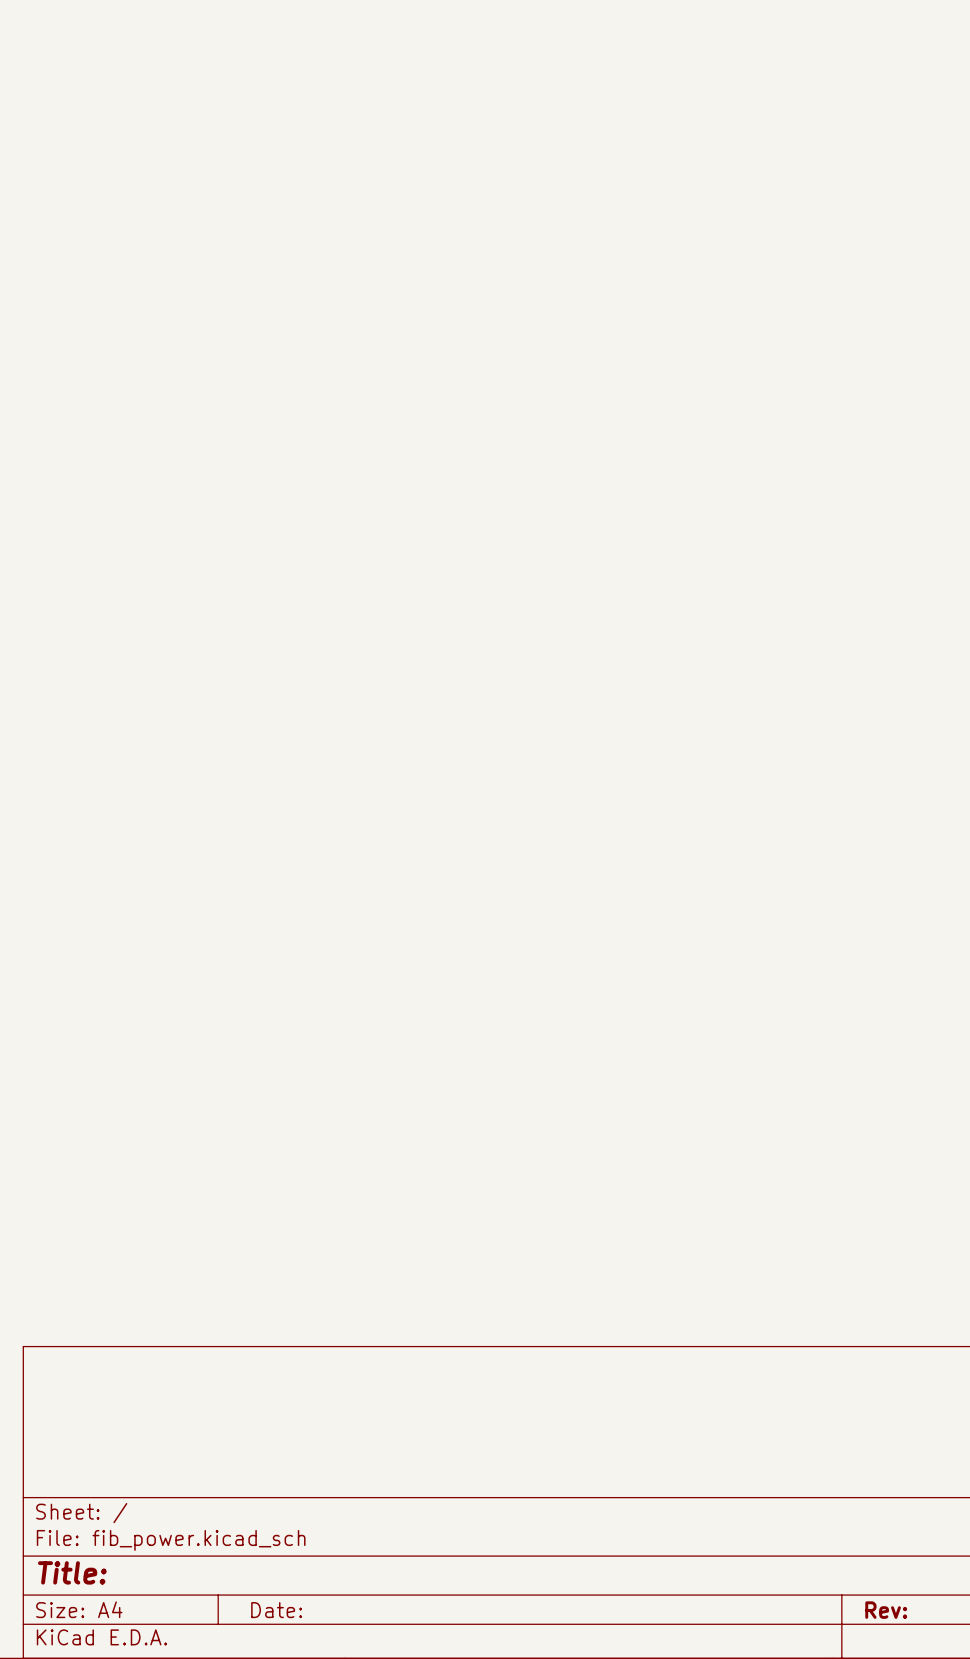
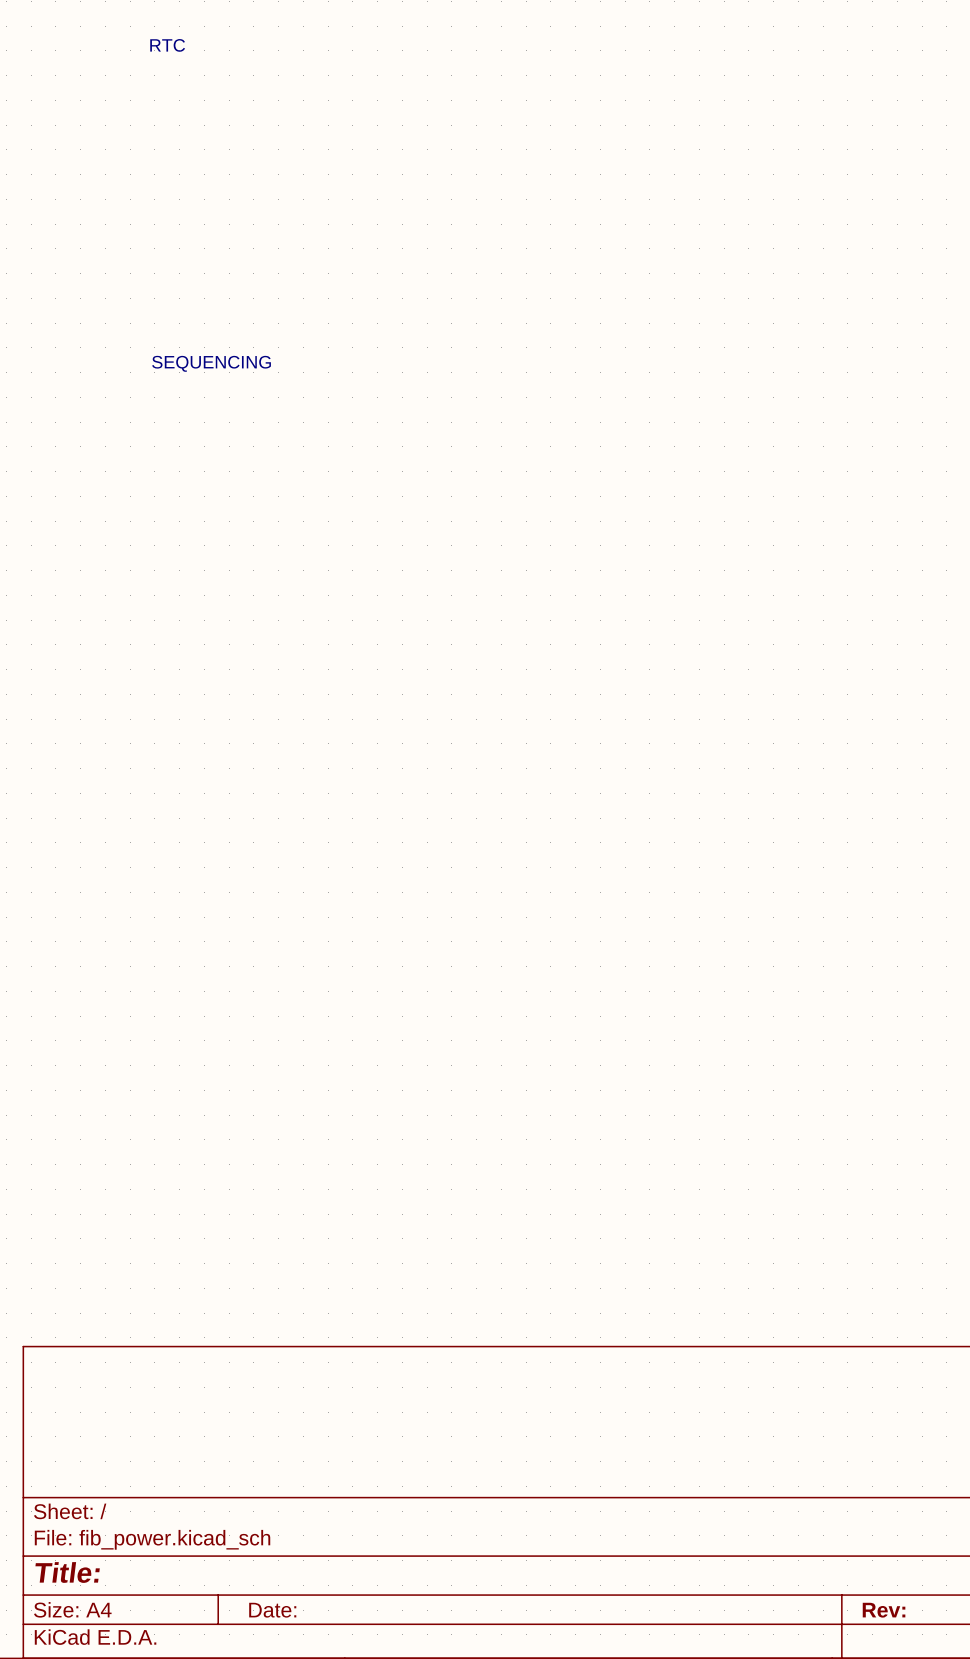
text: none -> RTC (167, 45)
text: none -> SEQUENCING (211, 363)

